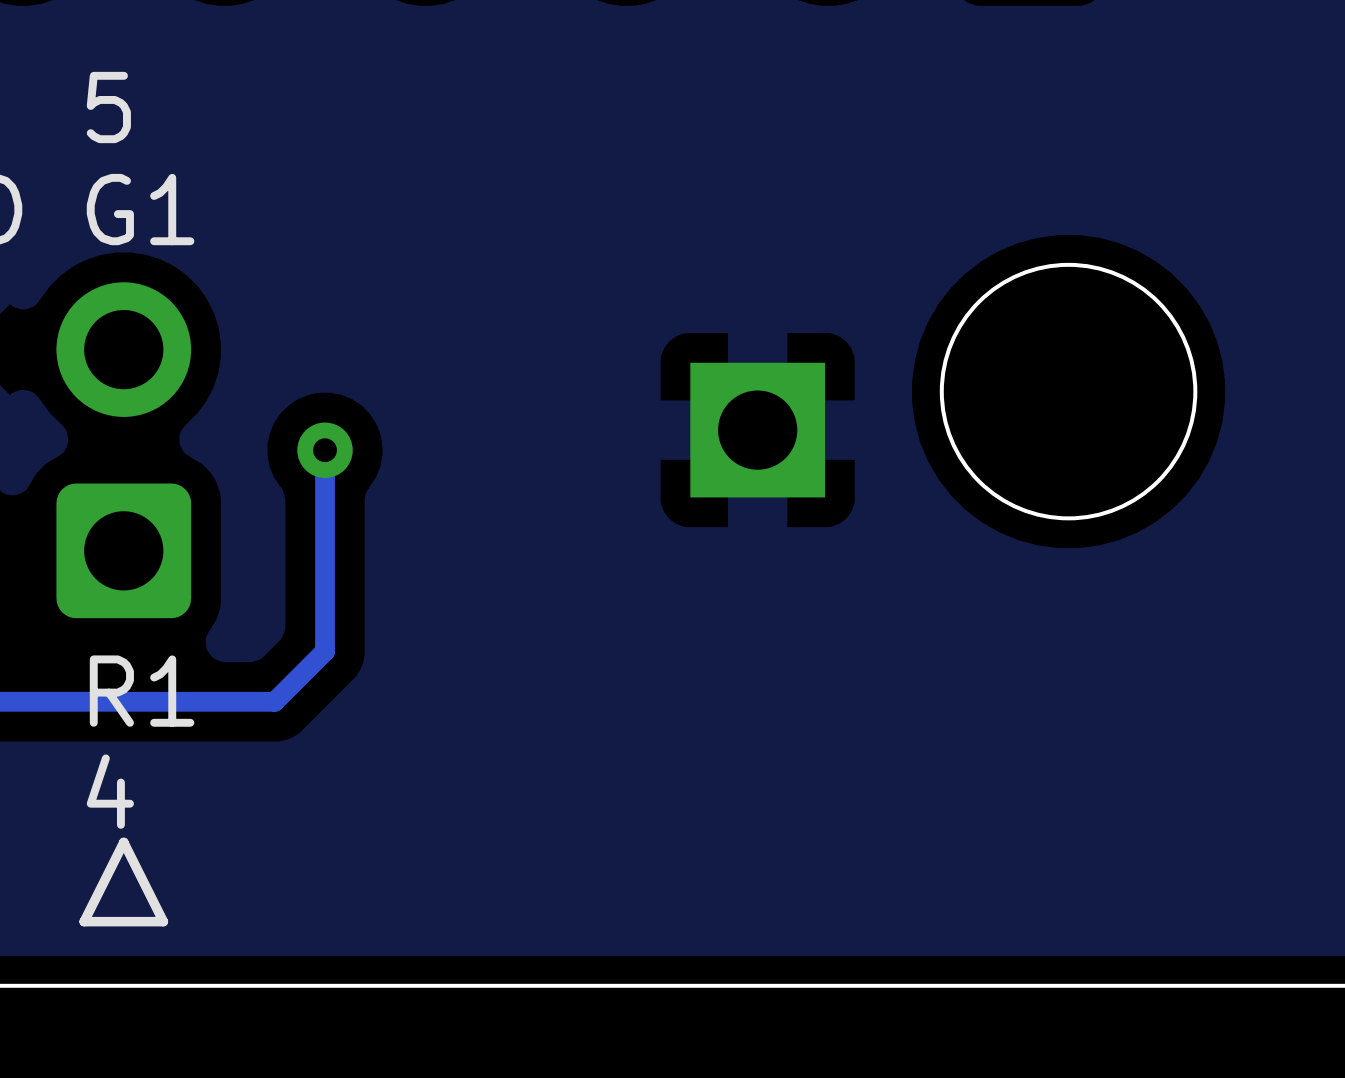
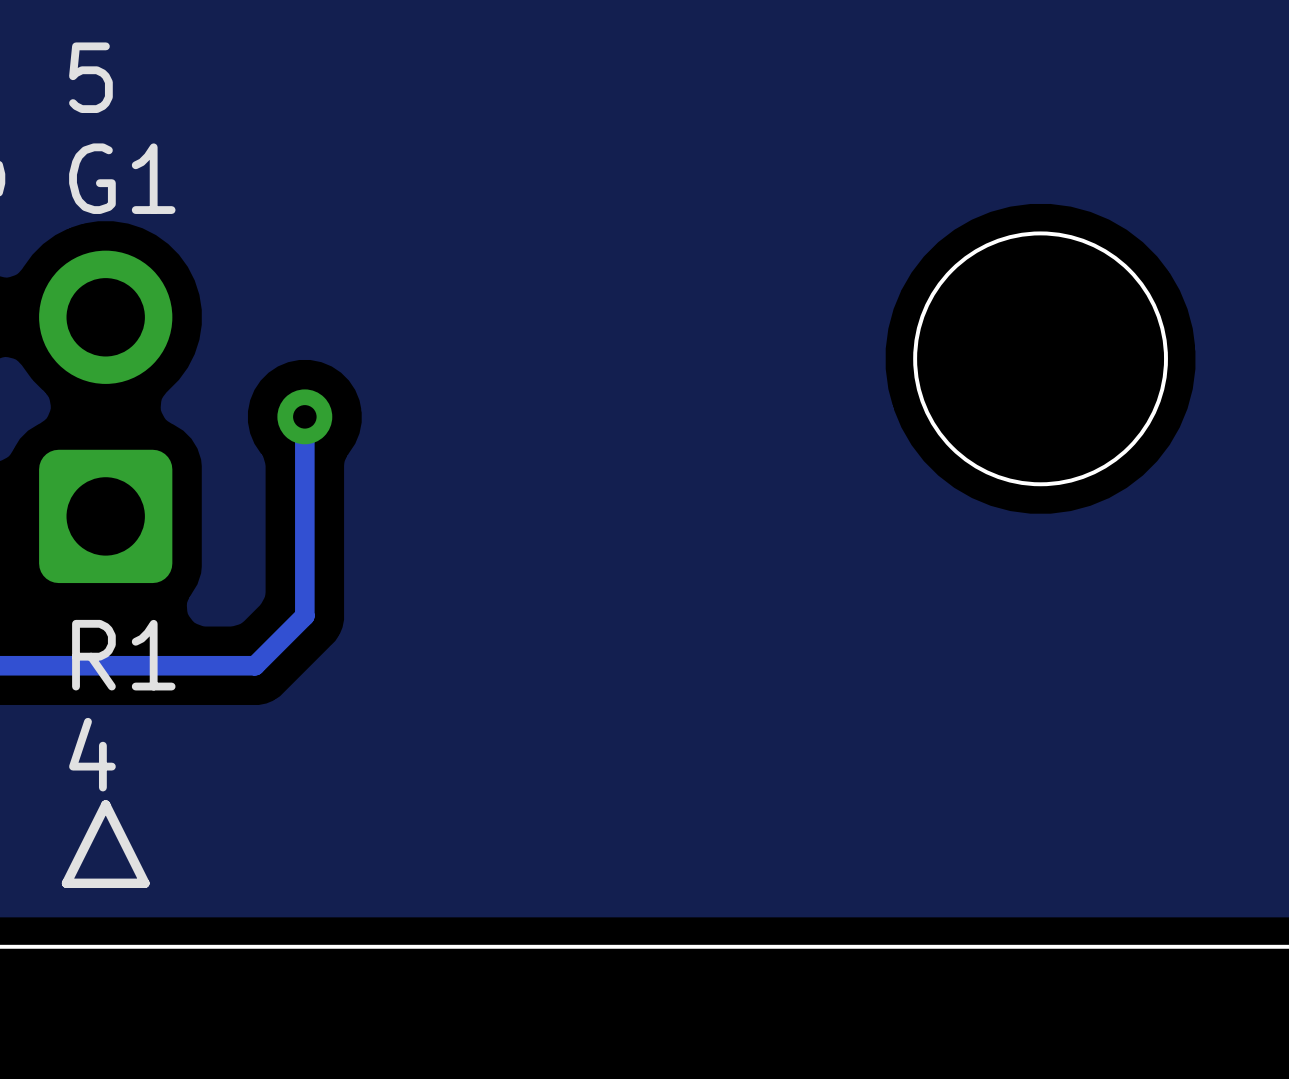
part: (757, 430) -> none

